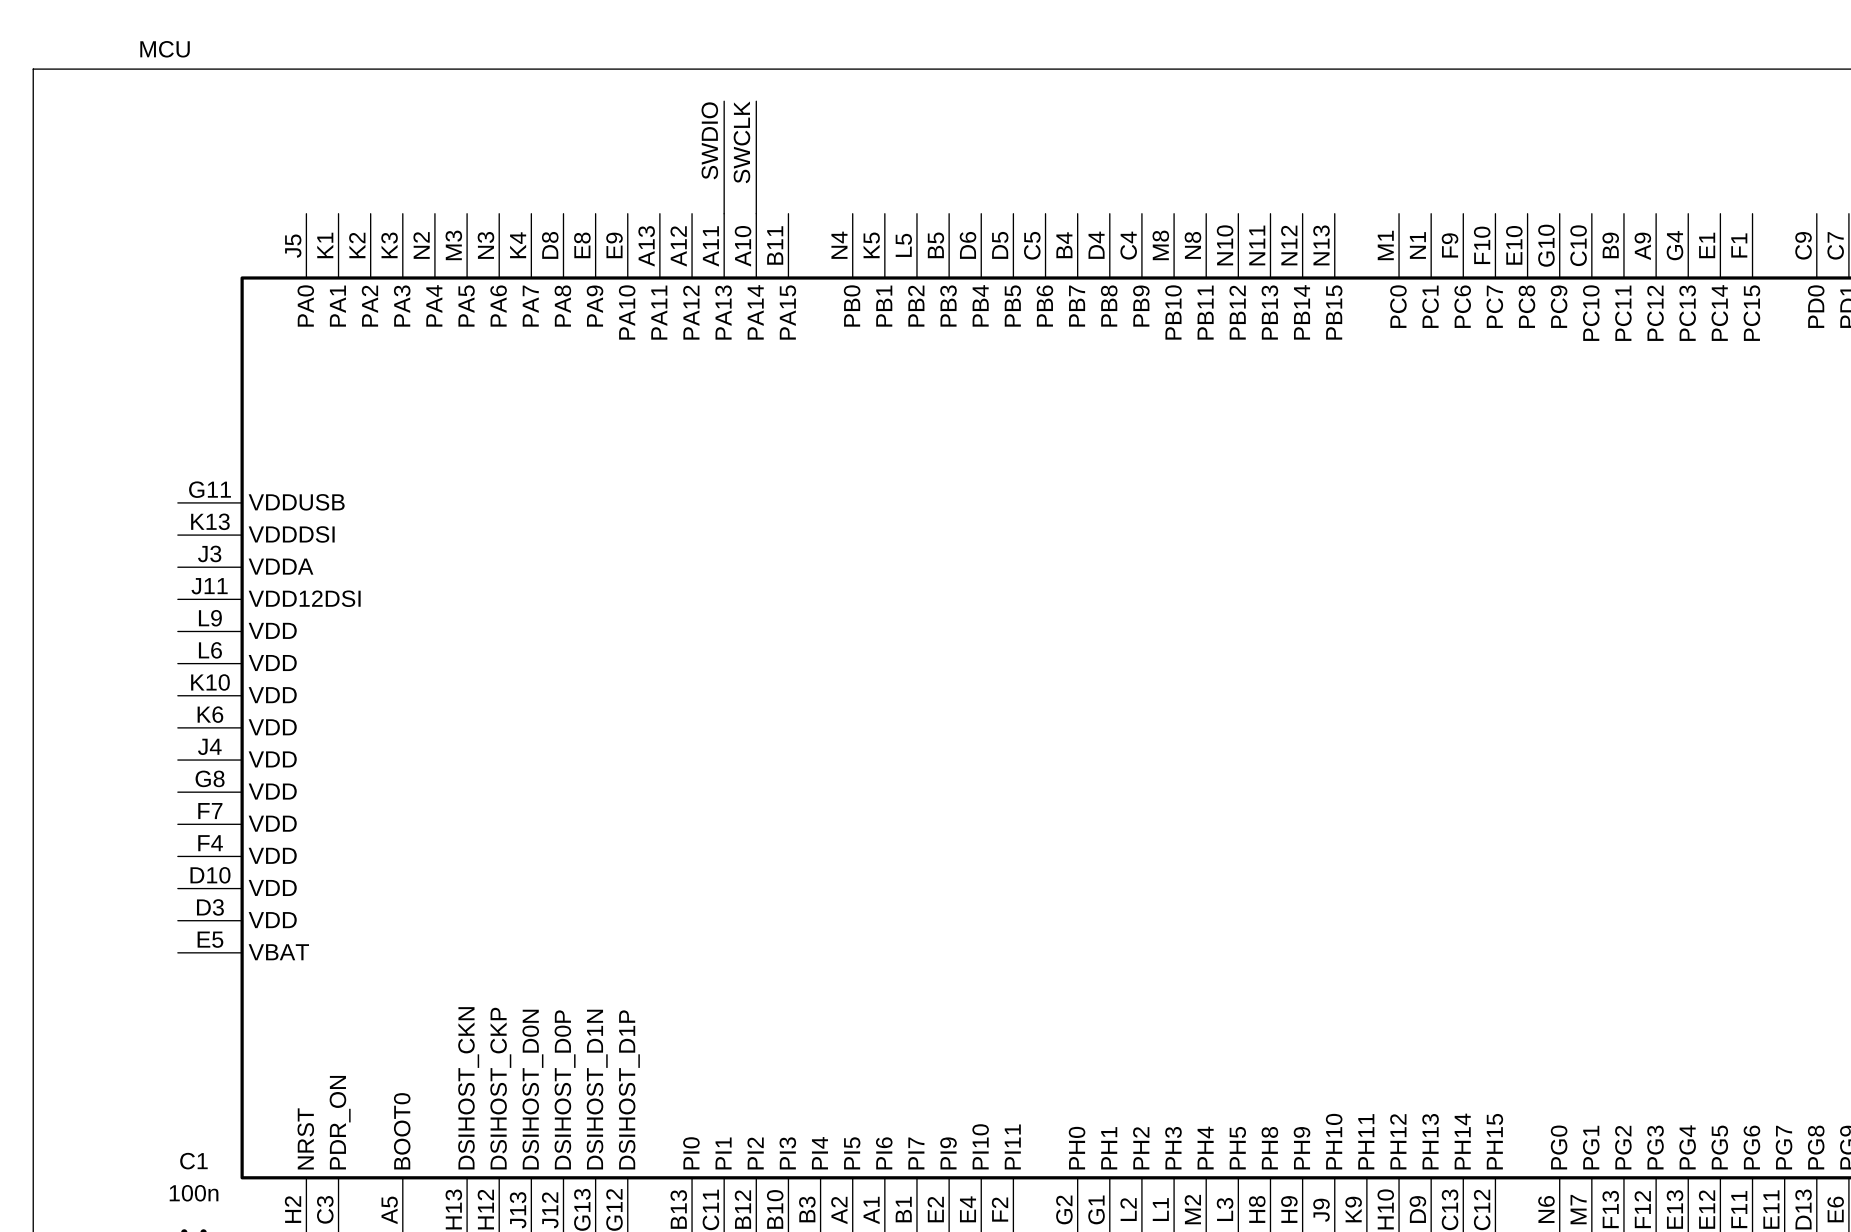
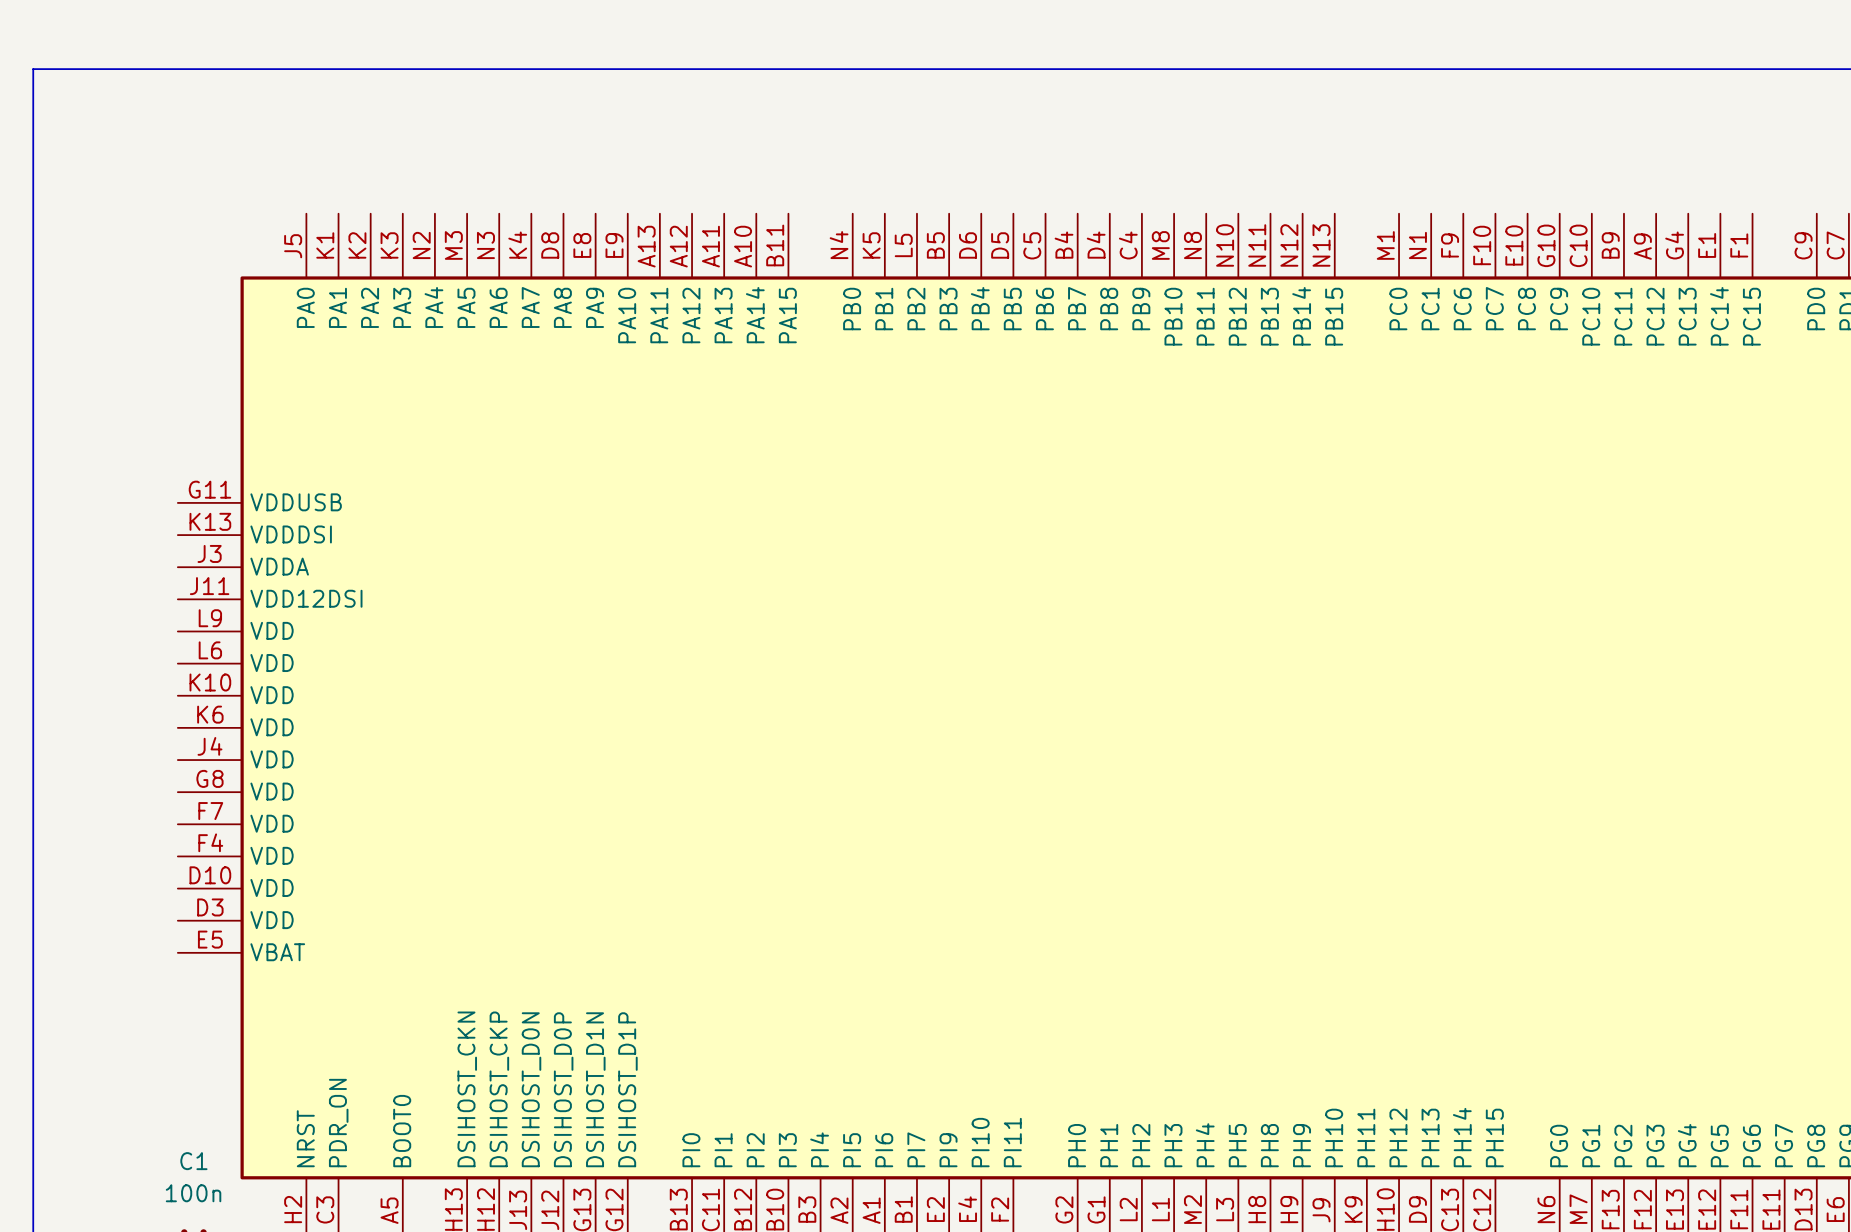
text: MCU (165, 49) -> none
wire: (724, 101) (724, 213) -> none
wire: (756, 101) (756, 213) -> none
label: SWDIO (709, 140) -> none
label: SWCLK (741, 142) -> none

